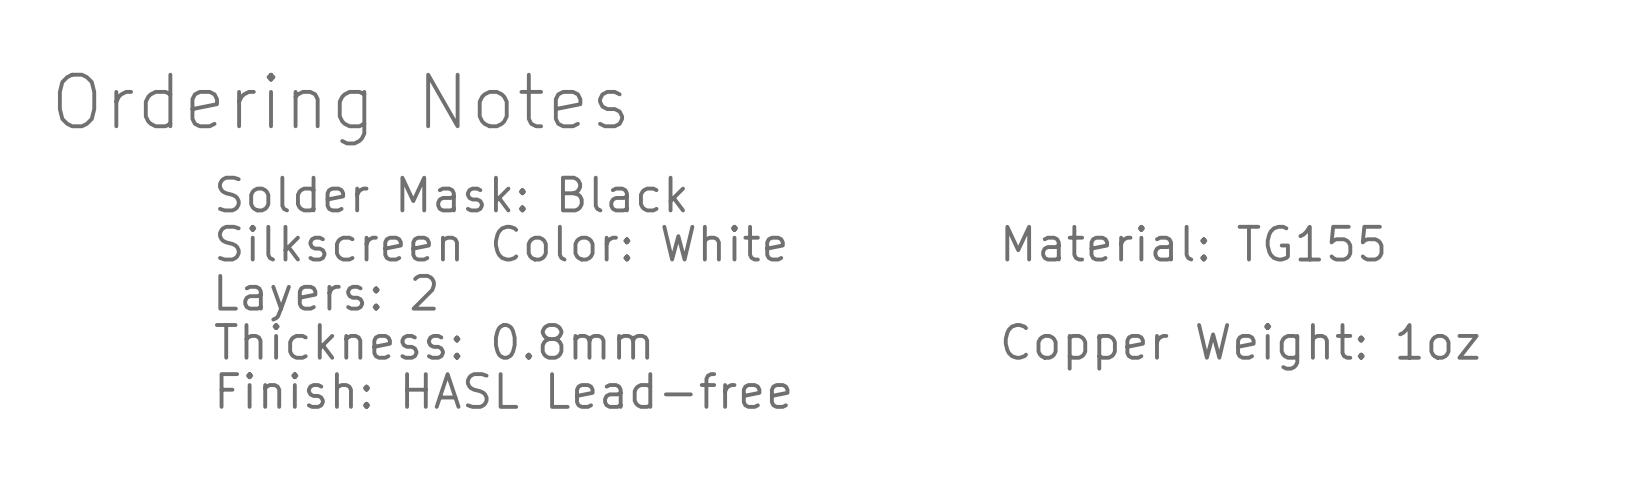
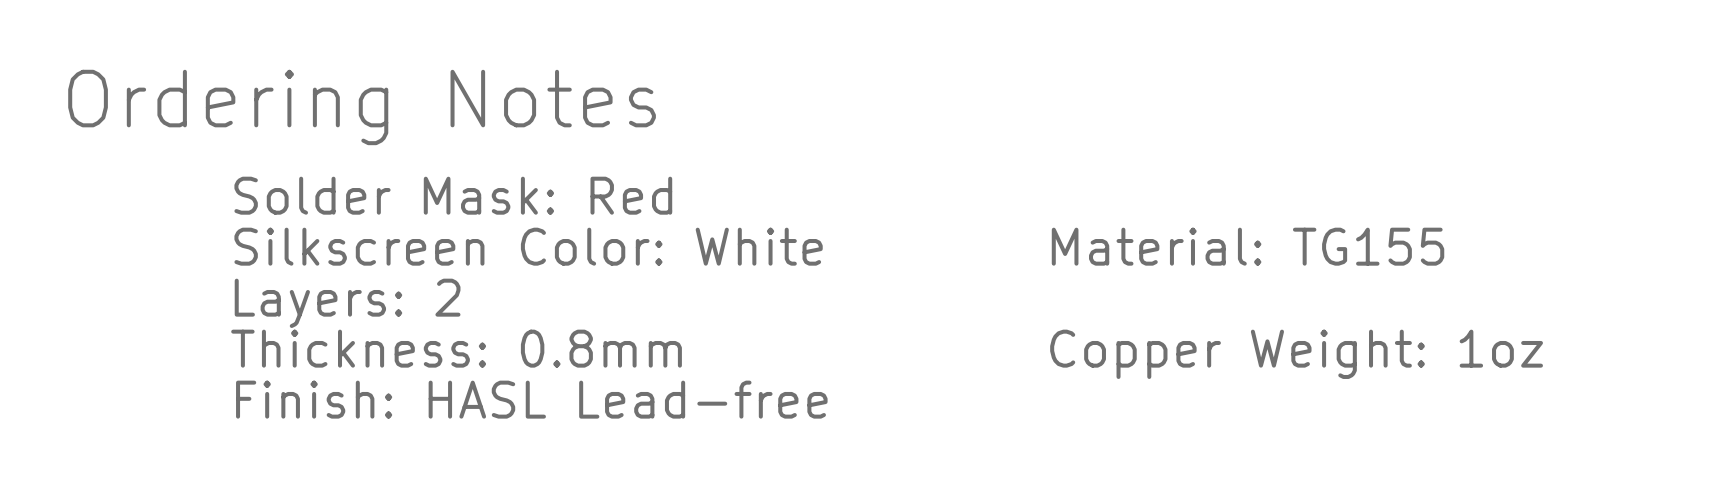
text: Solder Mask: Black (451, 194) -> Solder Mask: Red (453, 195)

